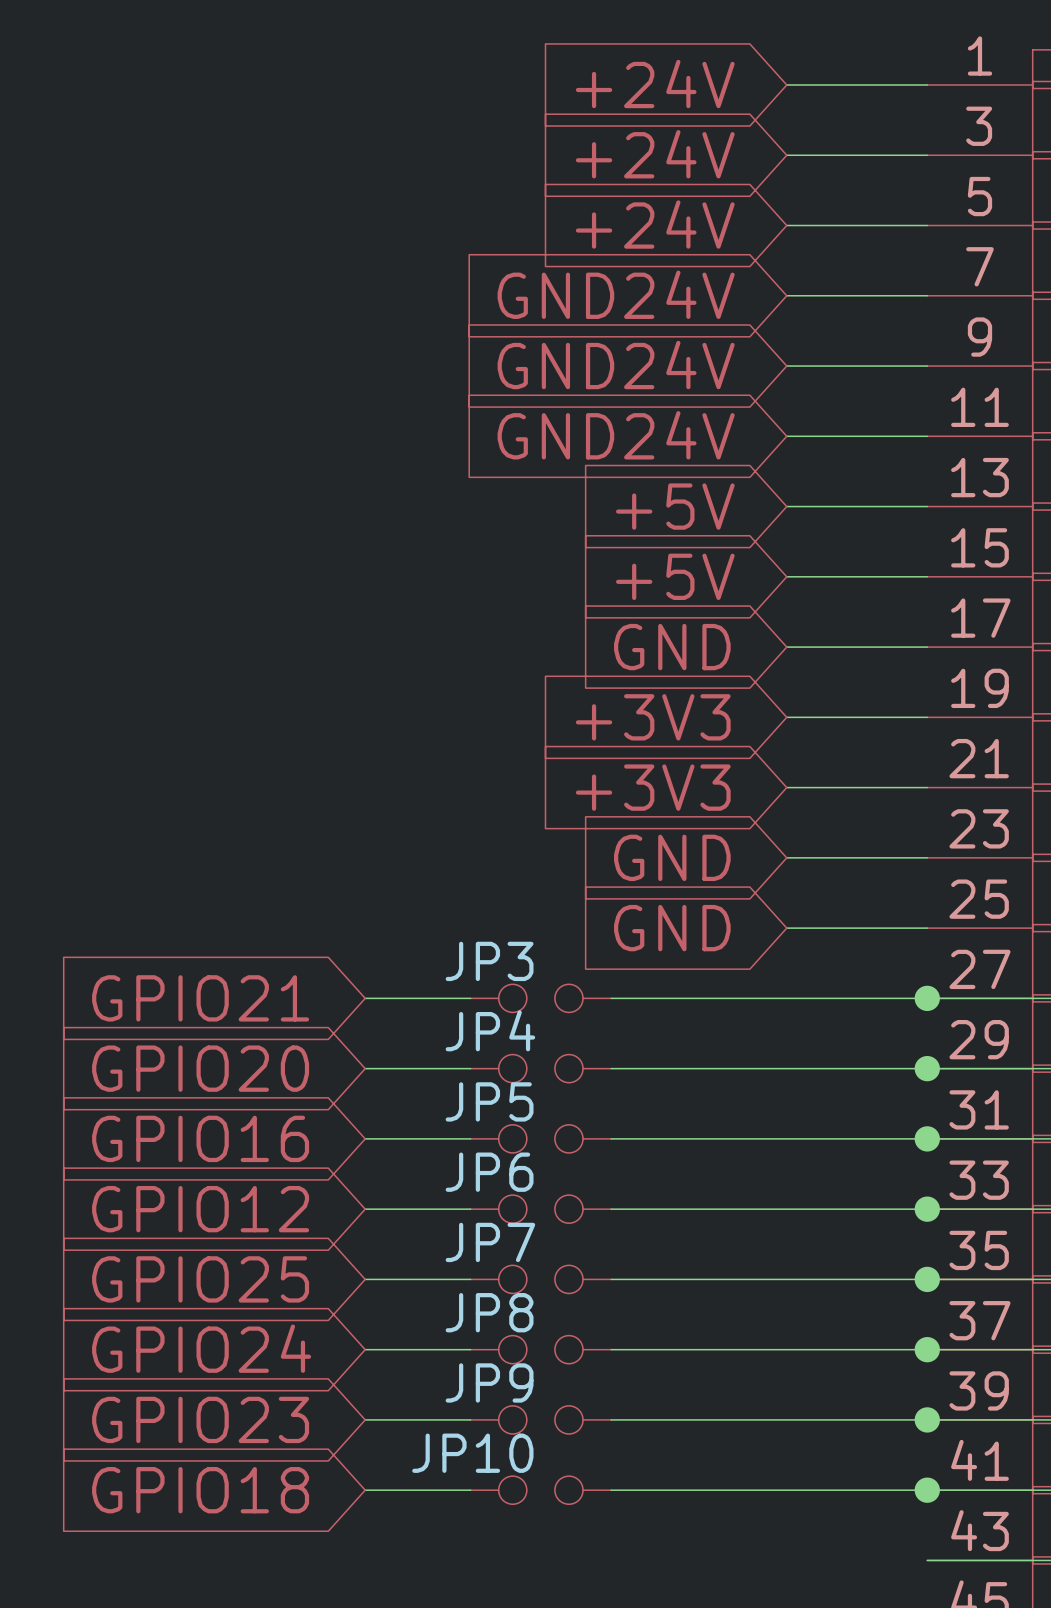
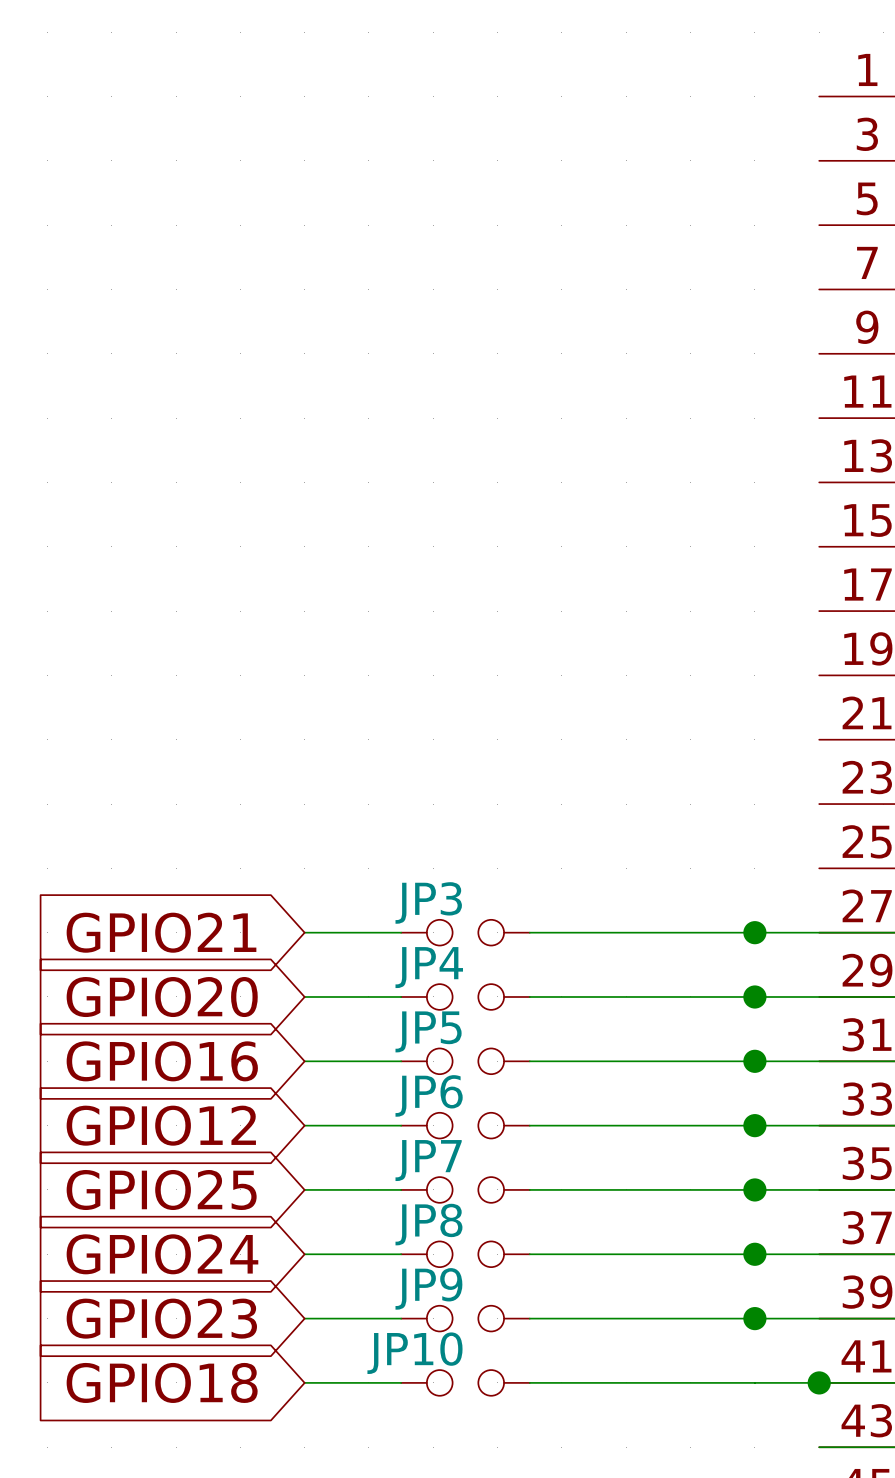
global label: +24V (655, 83) -> none
wire: (786, 84) (927, 84) -> none
global label: +24V (655, 154) -> none
wire: (786, 155) (927, 155) -> none
global label: +24V (655, 224) -> none
wire: (786, 225) (927, 225) -> none
global label: GND24V (616, 294) -> none
wire: (786, 295) (927, 295) -> none
global label: GND24V (616, 365) -> none
wire: (786, 366) (927, 366) -> none
global label: GND24V (616, 435) -> none
wire: (786, 436) (927, 436) -> none
global label: +5V (675, 506) -> none
wire: (786, 506) (927, 506) -> none
global label: +5V (675, 576) -> none
wire: (786, 576) (927, 576) -> none
global label: GND (672, 647) -> none
wire: (786, 647) (927, 647) -> none
global label: +3V3 (653, 717) -> none
wire: (786, 717) (927, 717) -> none
global label: +3V3 (653, 787) -> none
wire: (786, 787) (927, 787) -> none
global label: GND (672, 857) -> none
wire: (786, 857) (927, 857) -> none
global label: GND (672, 928) -> none
wire: (786, 928) (927, 928) -> none
junction: none -> (754, 932)
junction: (927, 998) -> none
junction: none -> (754, 996)
junction: (927, 1068) -> none
junction: none -> (754, 1061)
junction: (927, 1138) -> none
junction: none -> (754, 1125)
junction: (927, 1209) -> none
junction: none -> (754, 1189)
junction: (927, 1279) -> none
junction: none -> (754, 1254)
junction: (927, 1349) -> none
junction: none -> (754, 1318)
junction: (927, 1419) -> none

